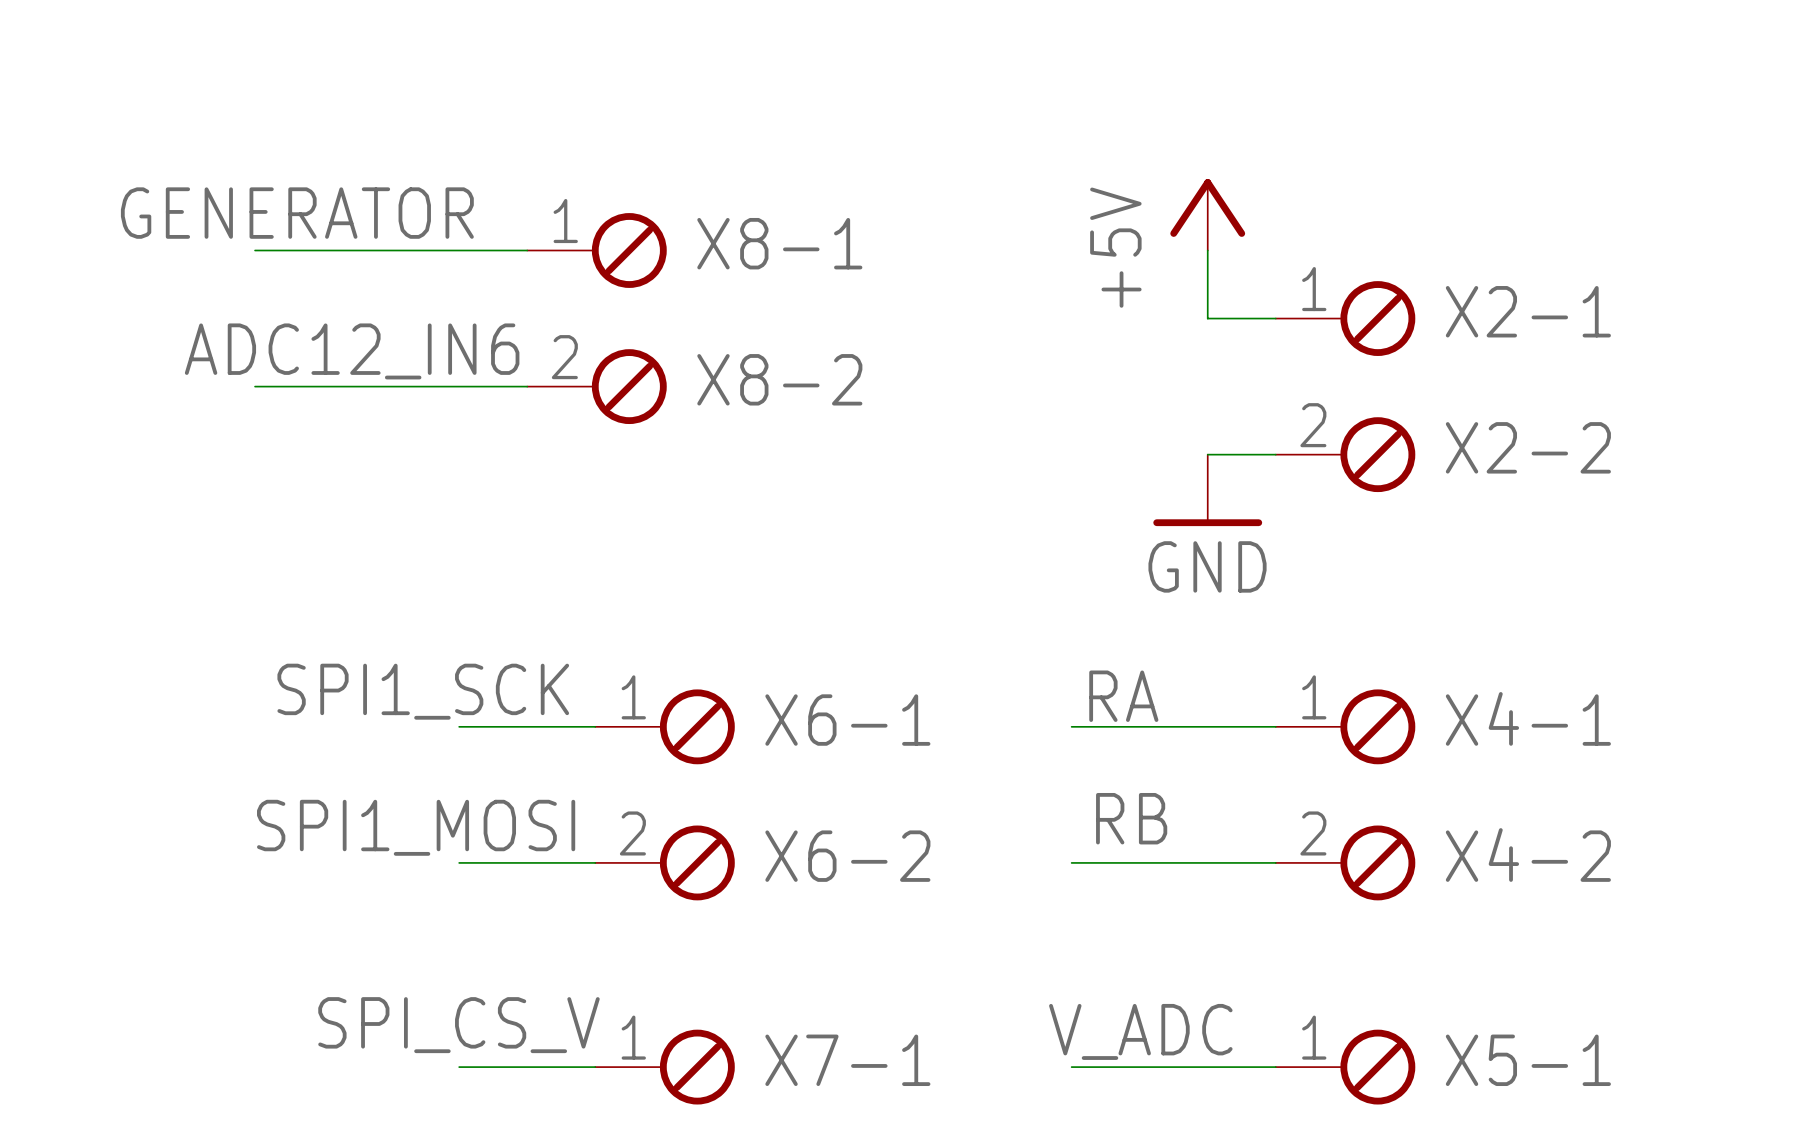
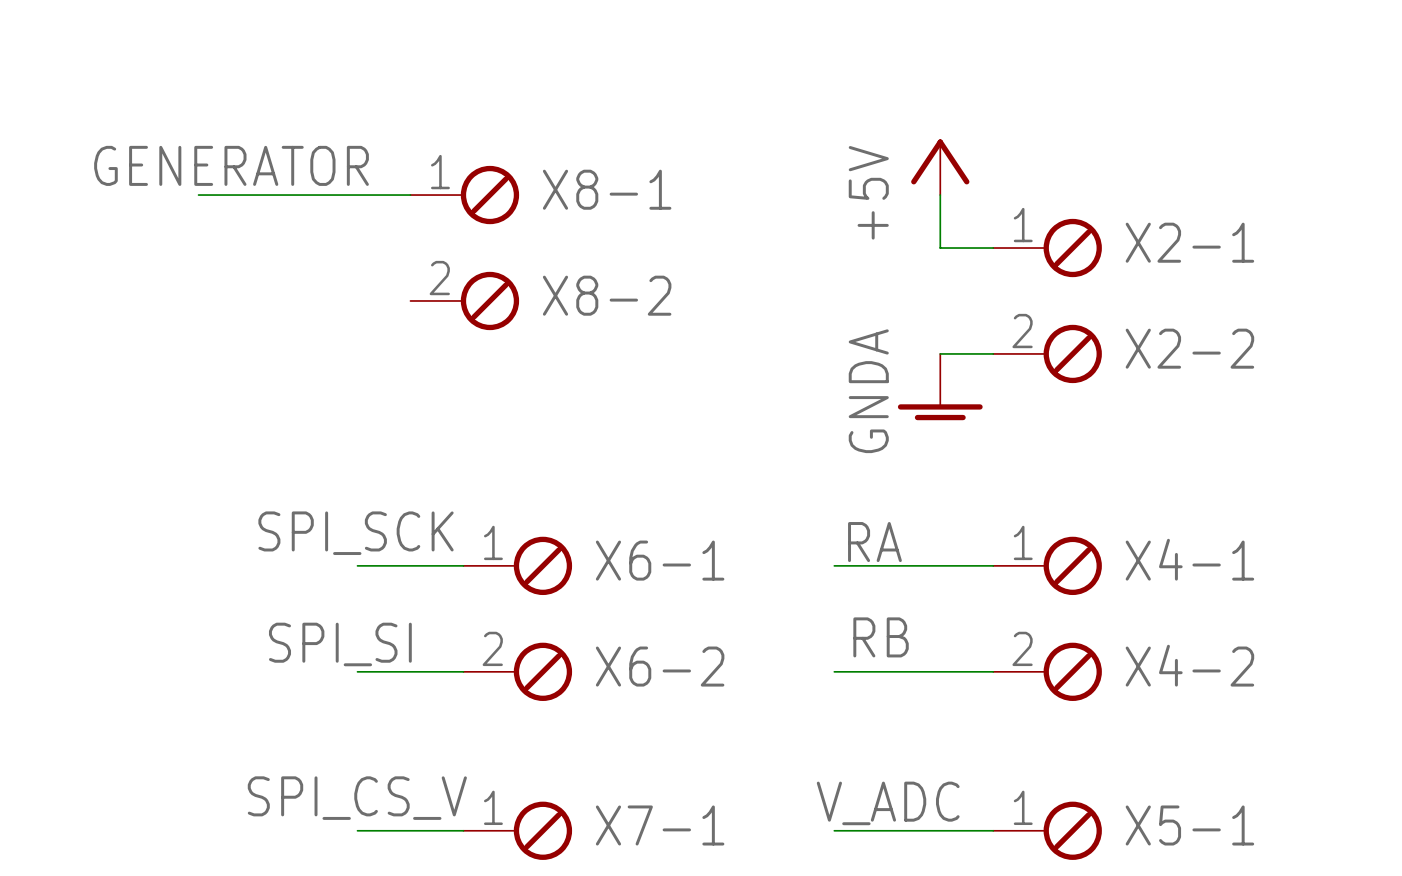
label: ADC12_IN6 (352, 351) -> none
wire: (255, 386) (527, 386) -> none
power symbol: GND (1207, 490) -> GNDA (940, 387)
label: SPI1_SCK (423, 691) -> SPI_SCK (356, 533)
label: SPI1_MOSI (416, 827) -> SPI_SI (340, 644)

